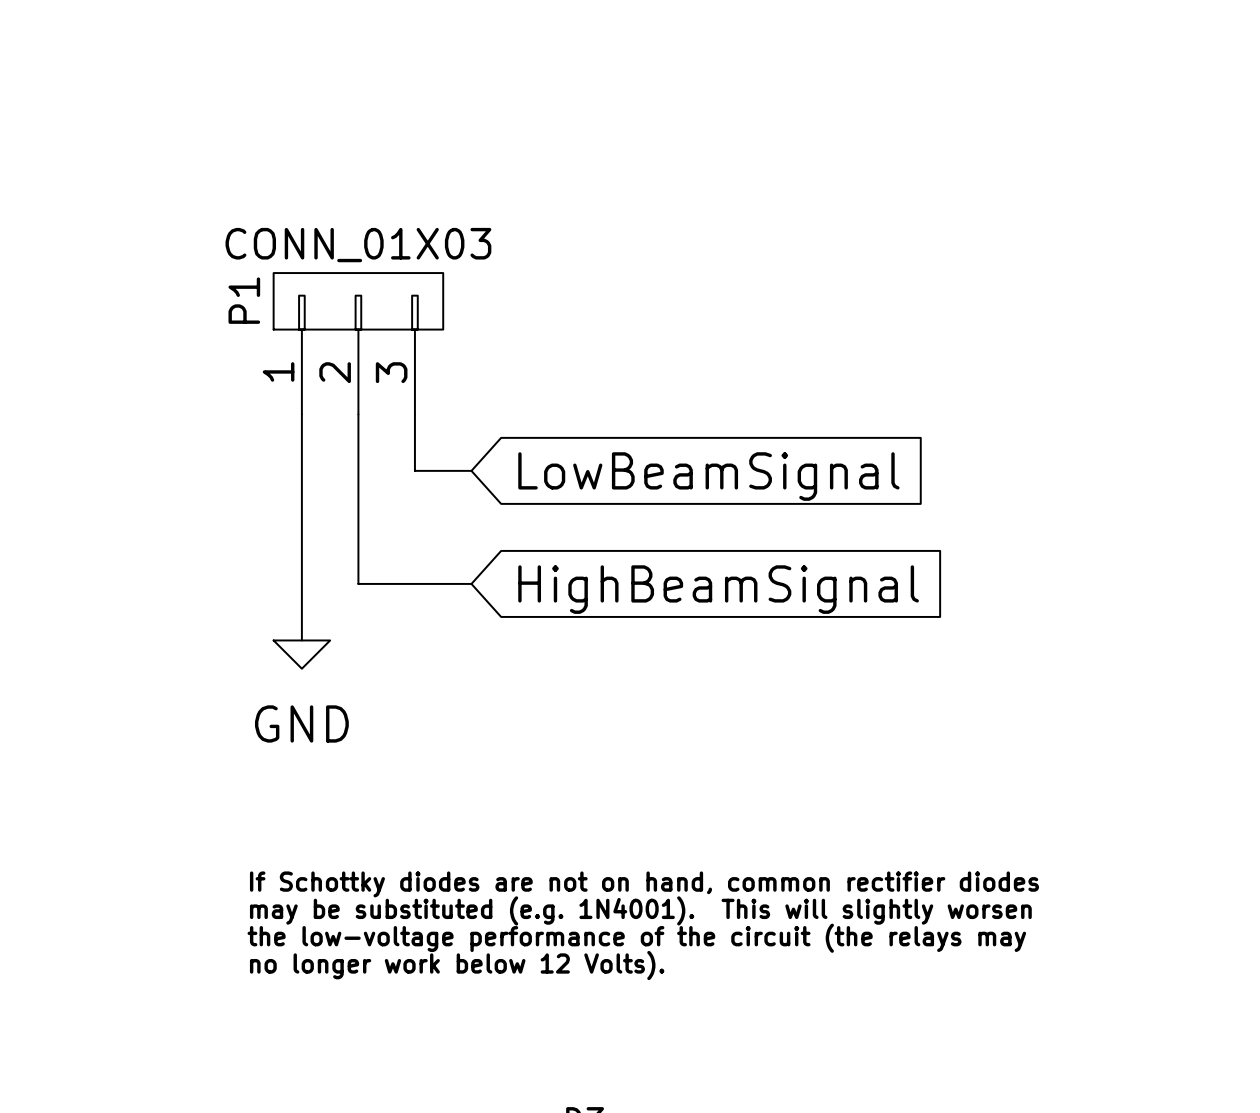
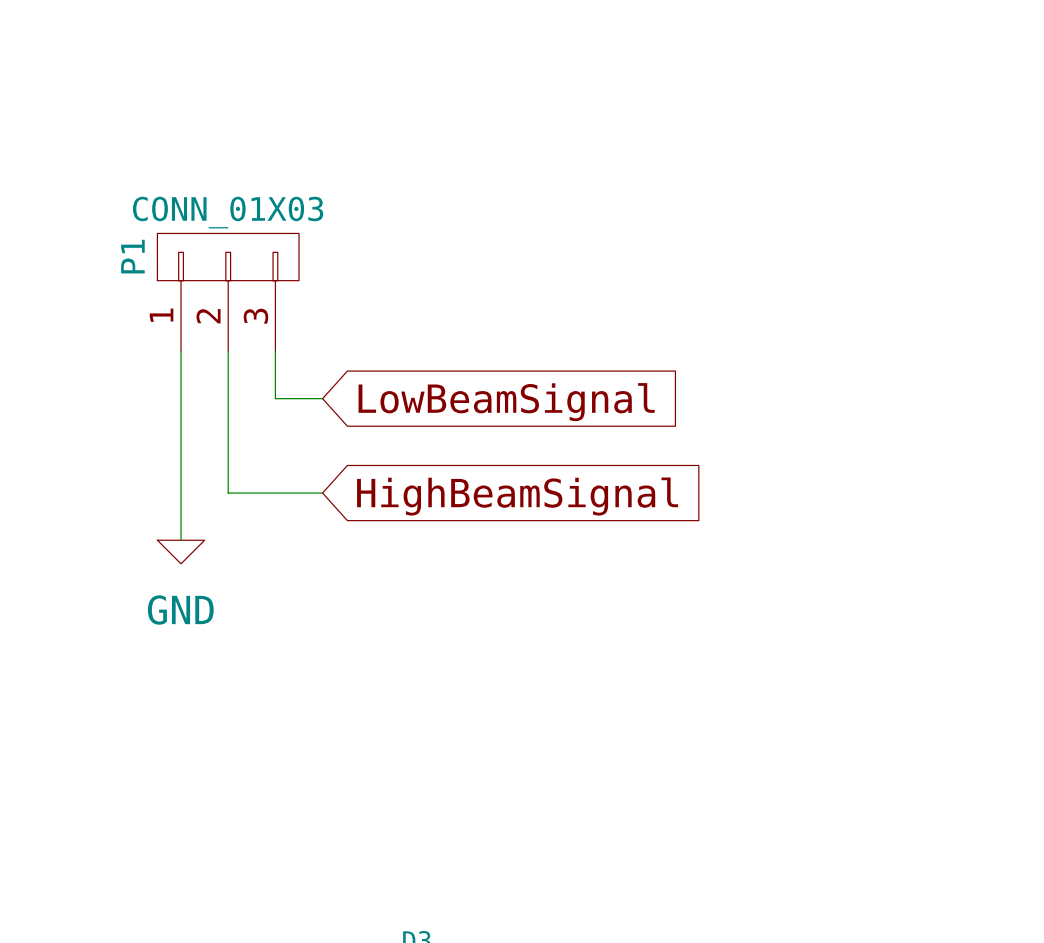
text: If Schottky diodes are not on hand, common rectifier diodes (644, 884) -> none
text: may be substituted (e.g. 1N4001). This will slightly worsen (640, 910) -> none
text: the low-voltage performance of the circuit (the relays may (636, 938) -> none
text: no longer work below 12 Volts). (457, 965) -> none

